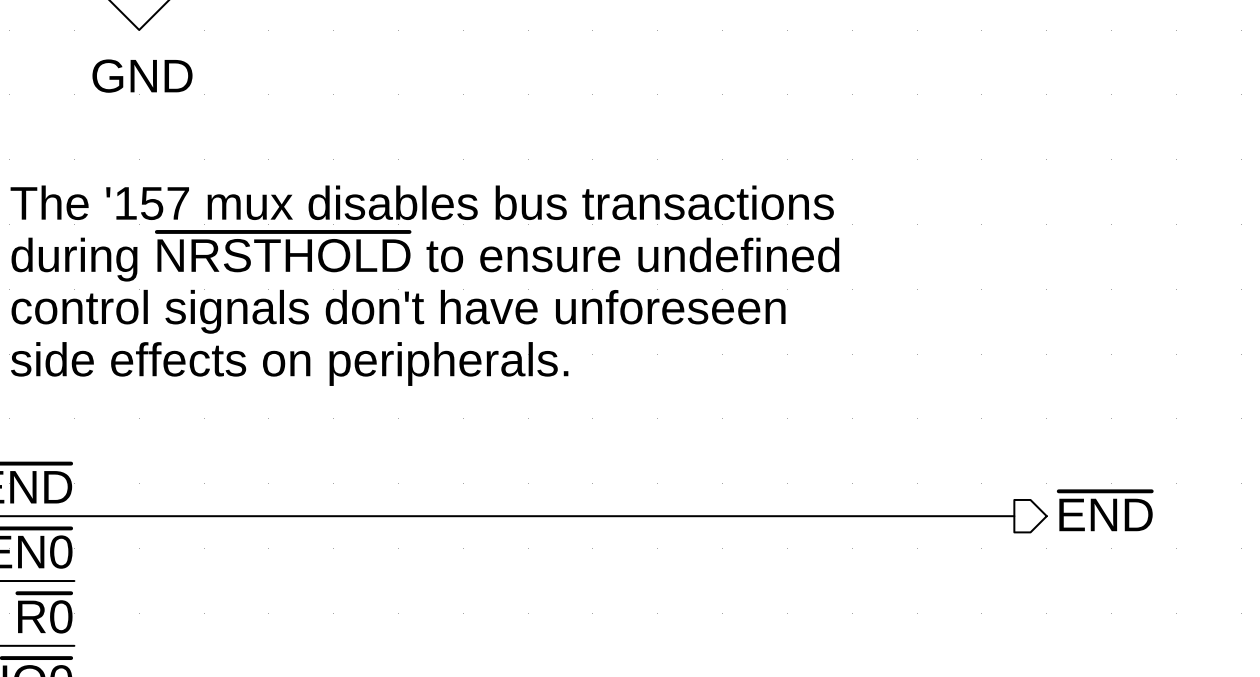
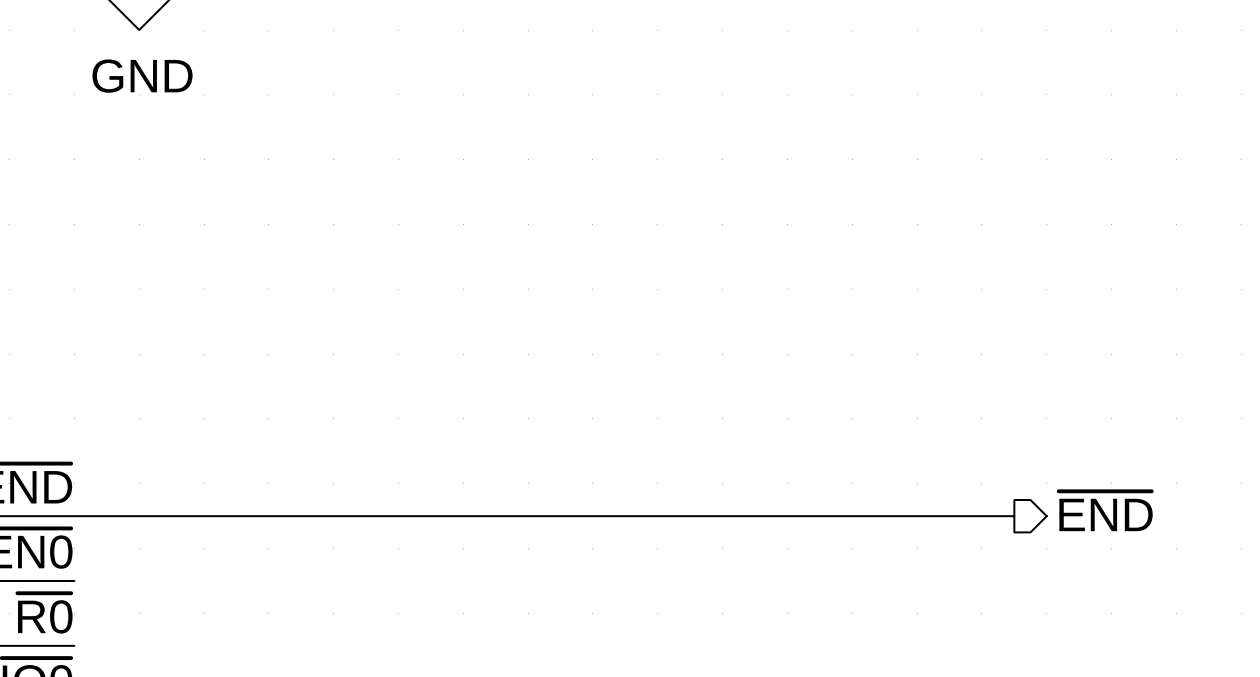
text: The '157 mux disables bus transactions (422, 202) -> none
text: during ~{NRSTHOLD} to ensure undefined (425, 256) -> none
text: control signals don't have unforeseen (398, 311) -> none
text: side effects on peripherals. (289, 364) -> none

